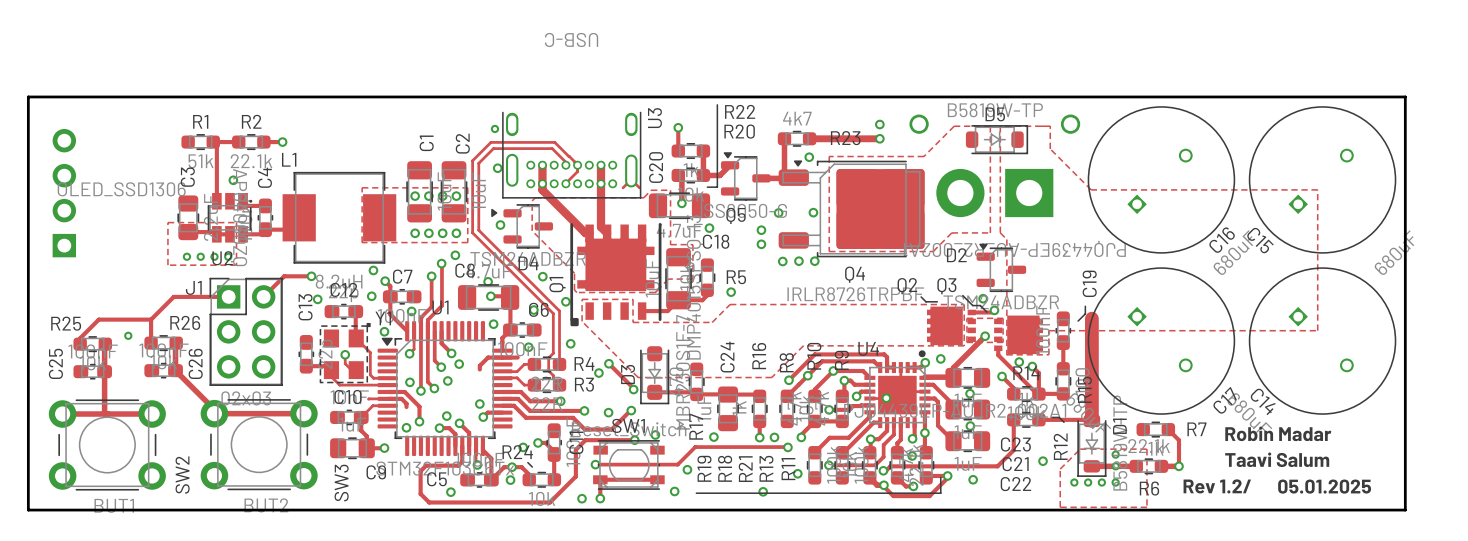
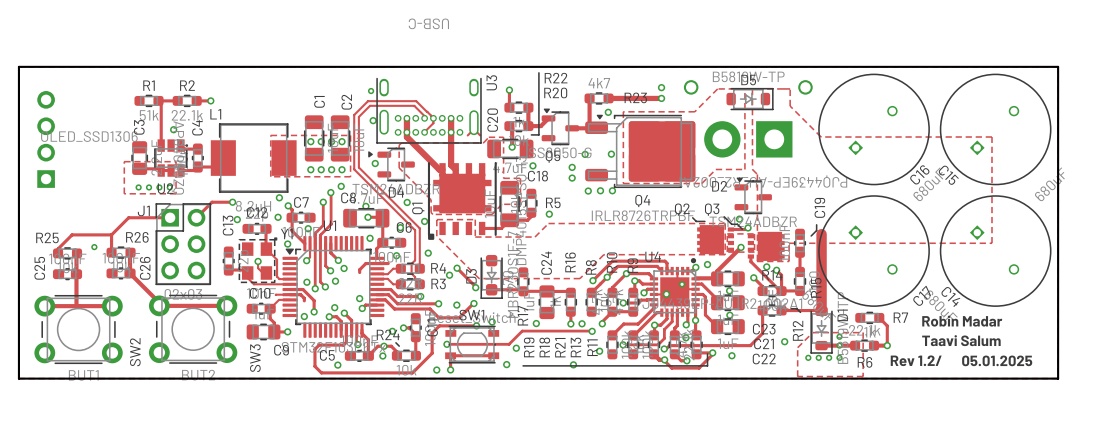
via: none -> (682, 284)

